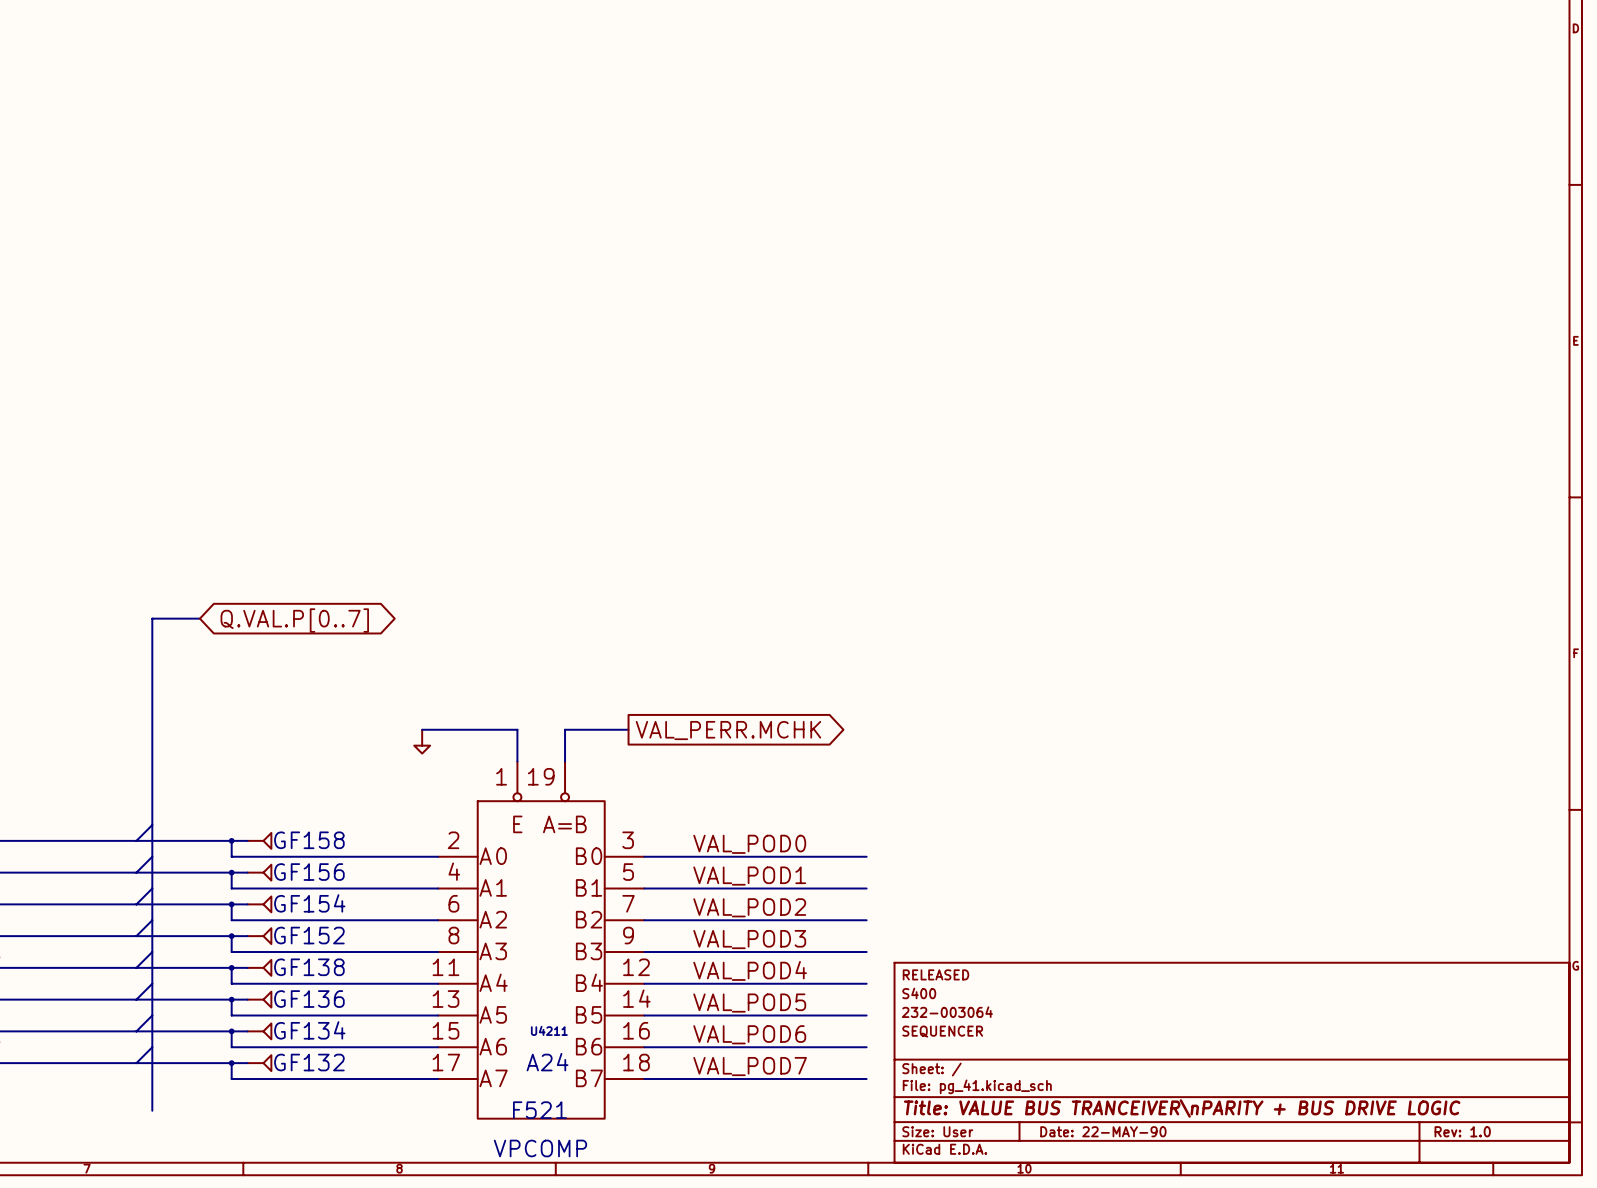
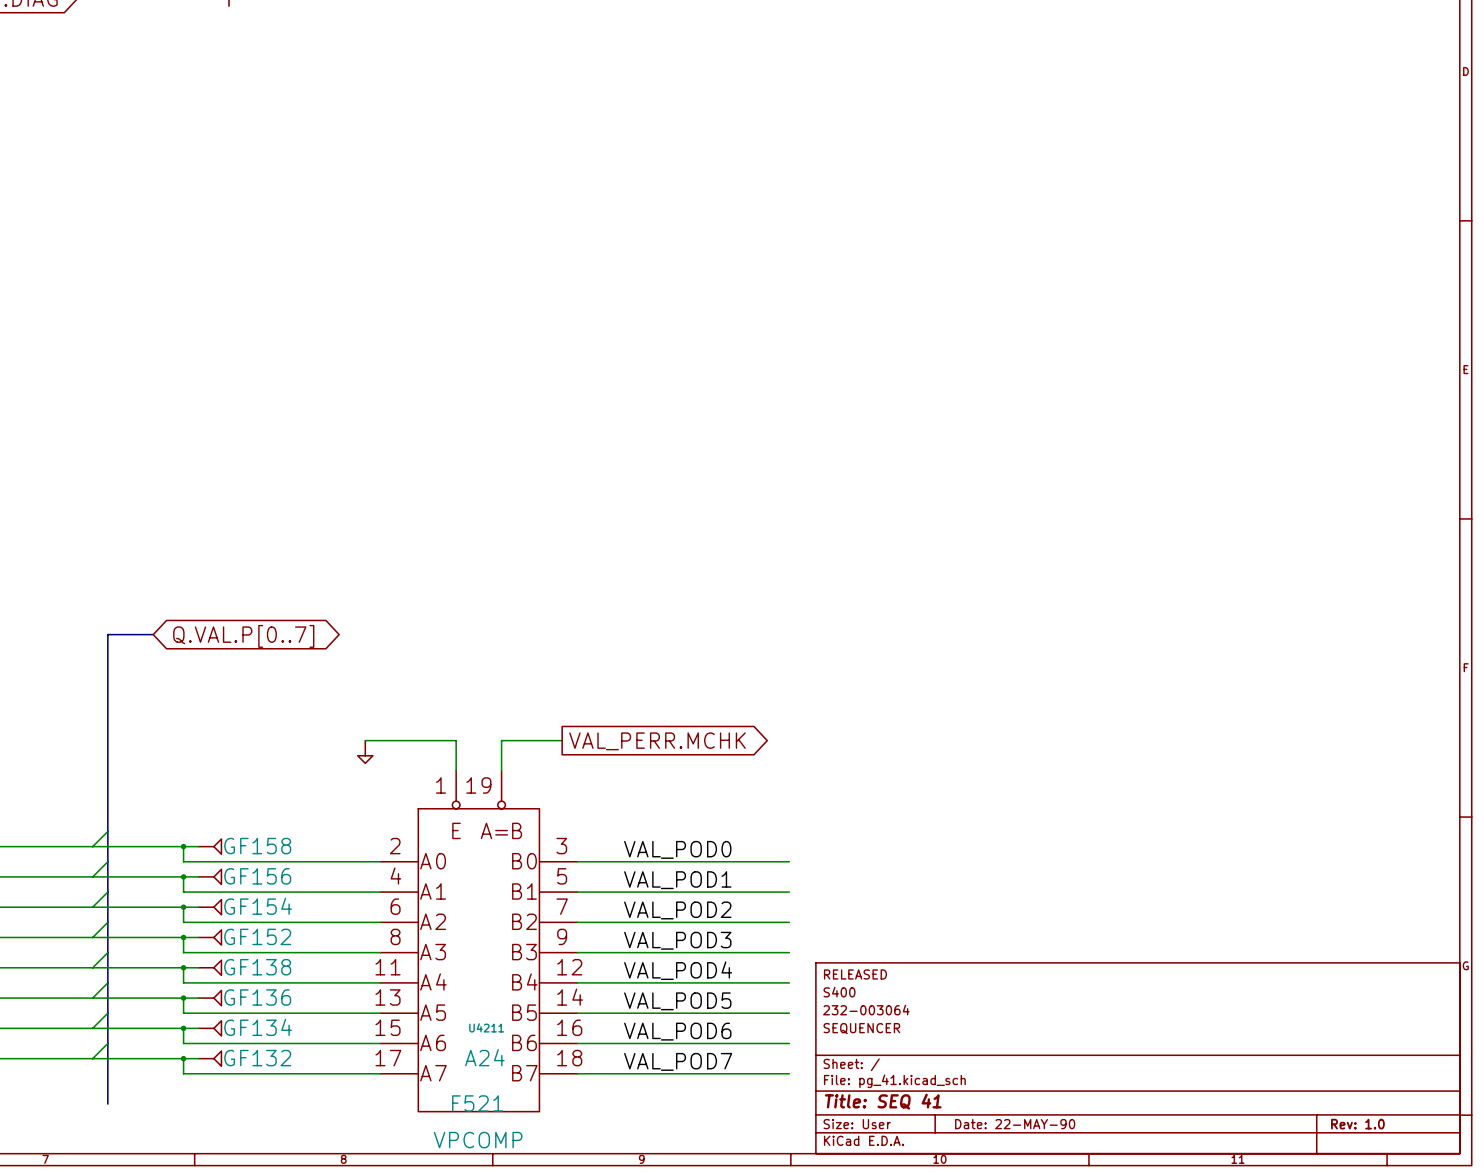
title block: Title: VALUE BUS TRANCEIVER\nPARITY + BUS DRIVE LOGIC (1182, 1108) -> Title: SEQ 41 (883, 1101)

